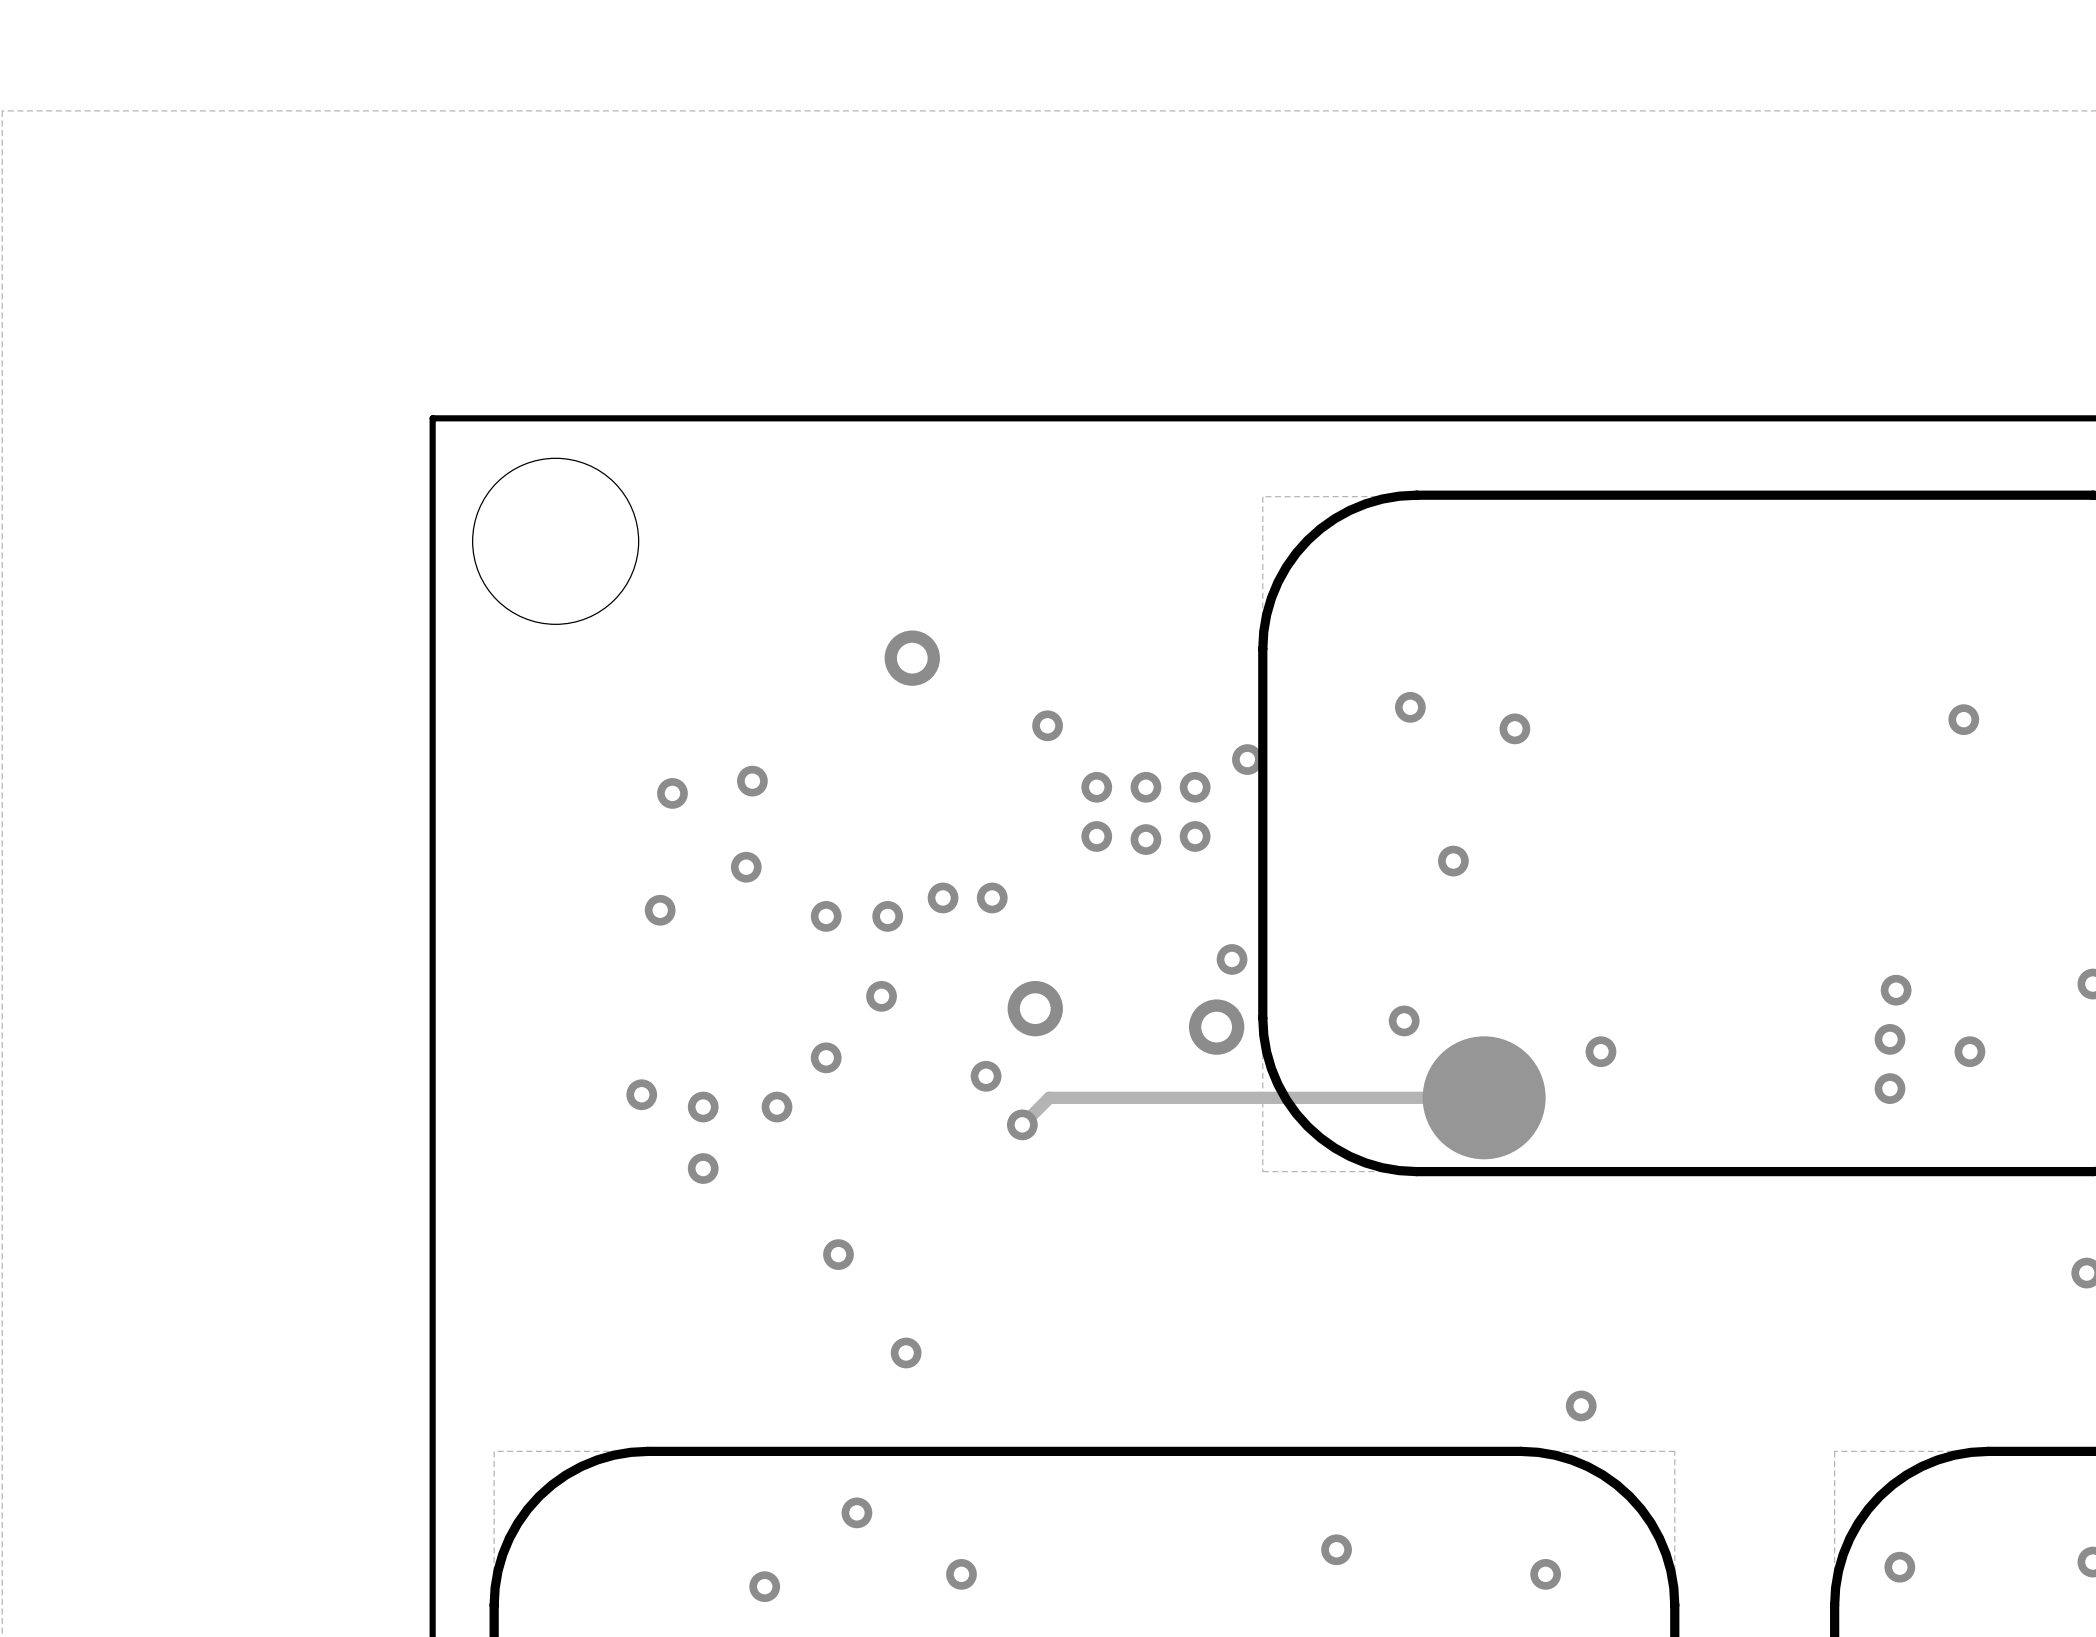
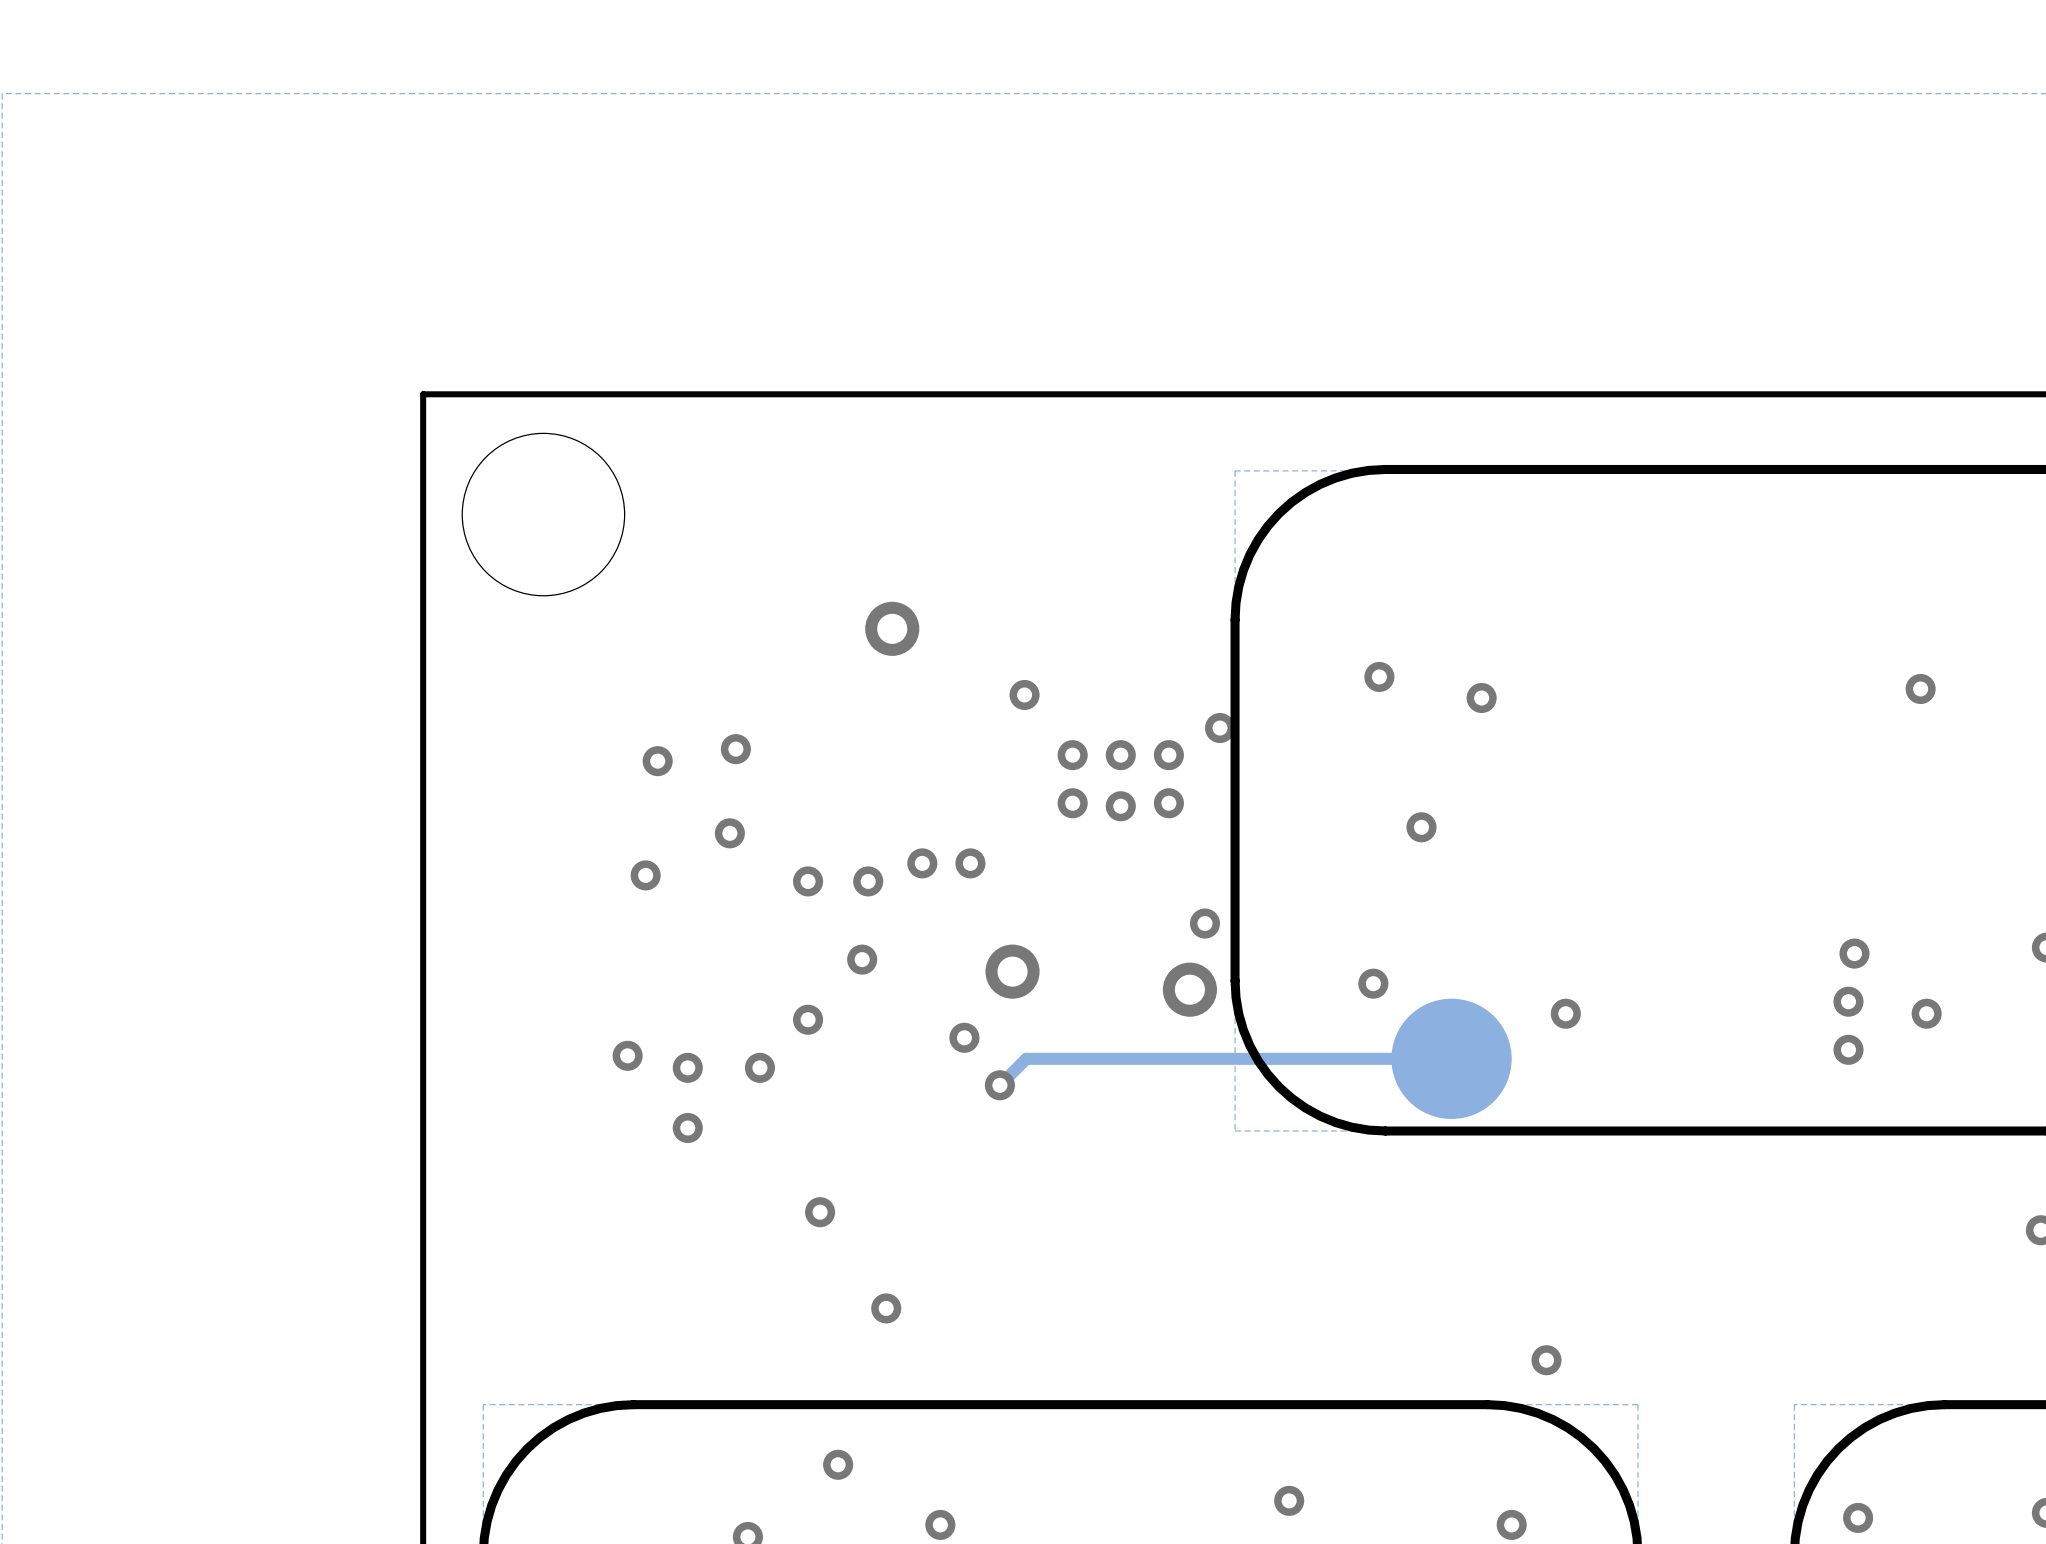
via position: (1336, 1549) -> (1289, 1500)

